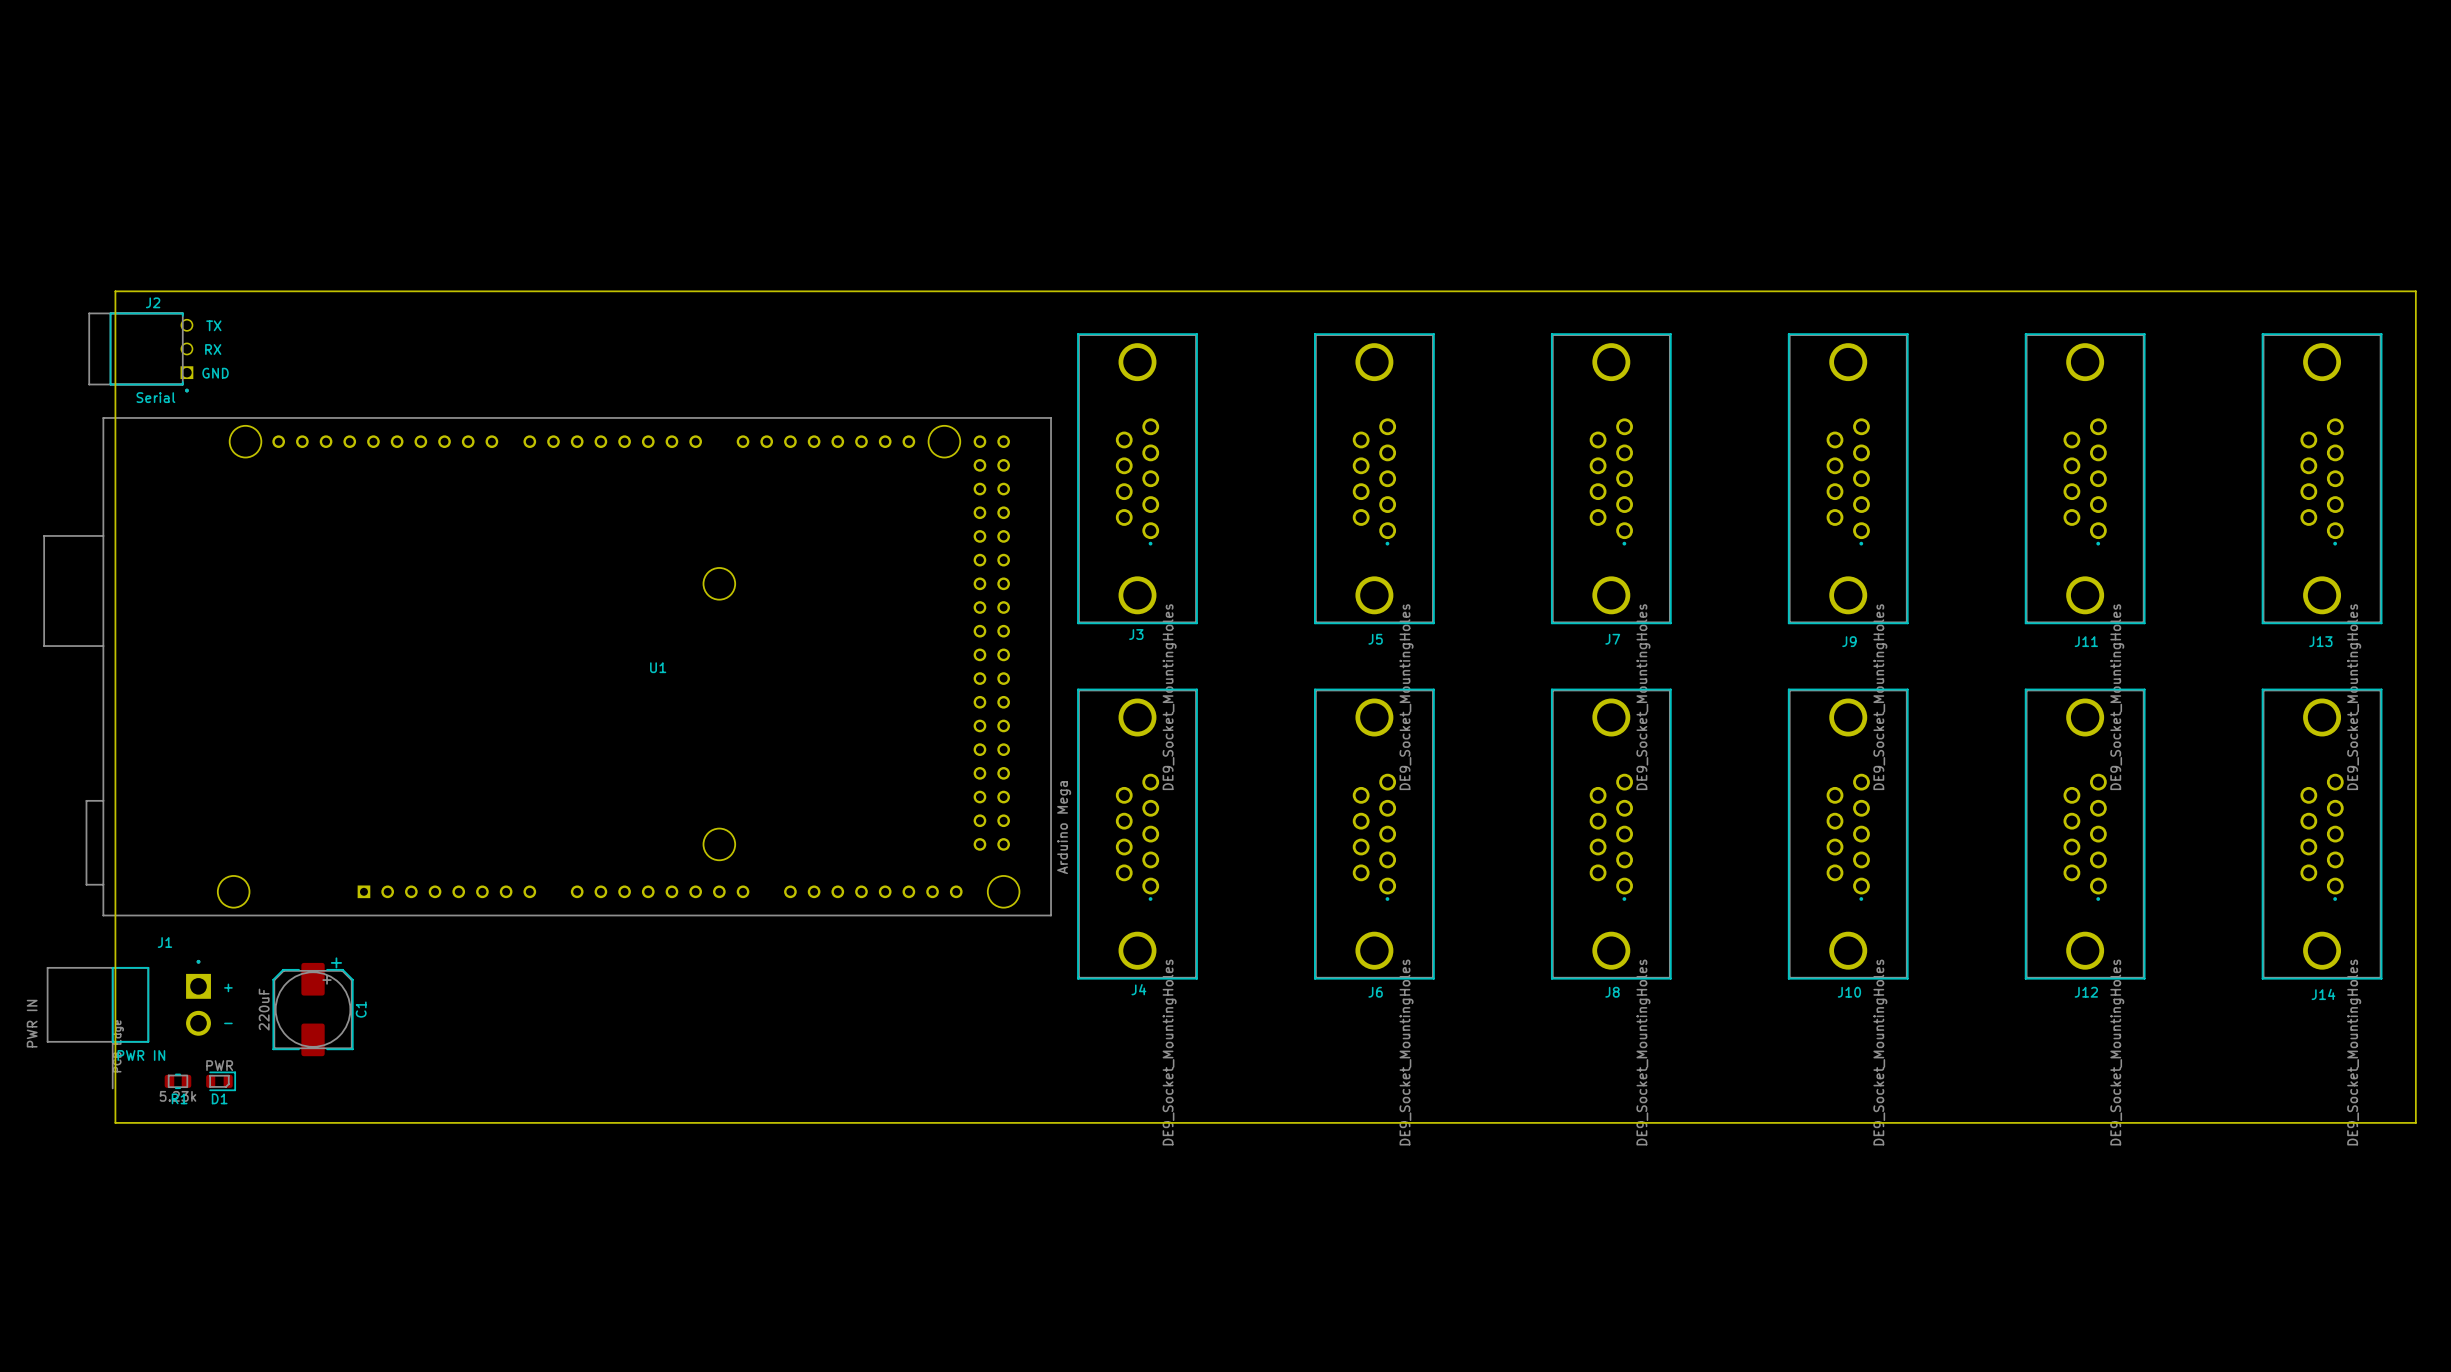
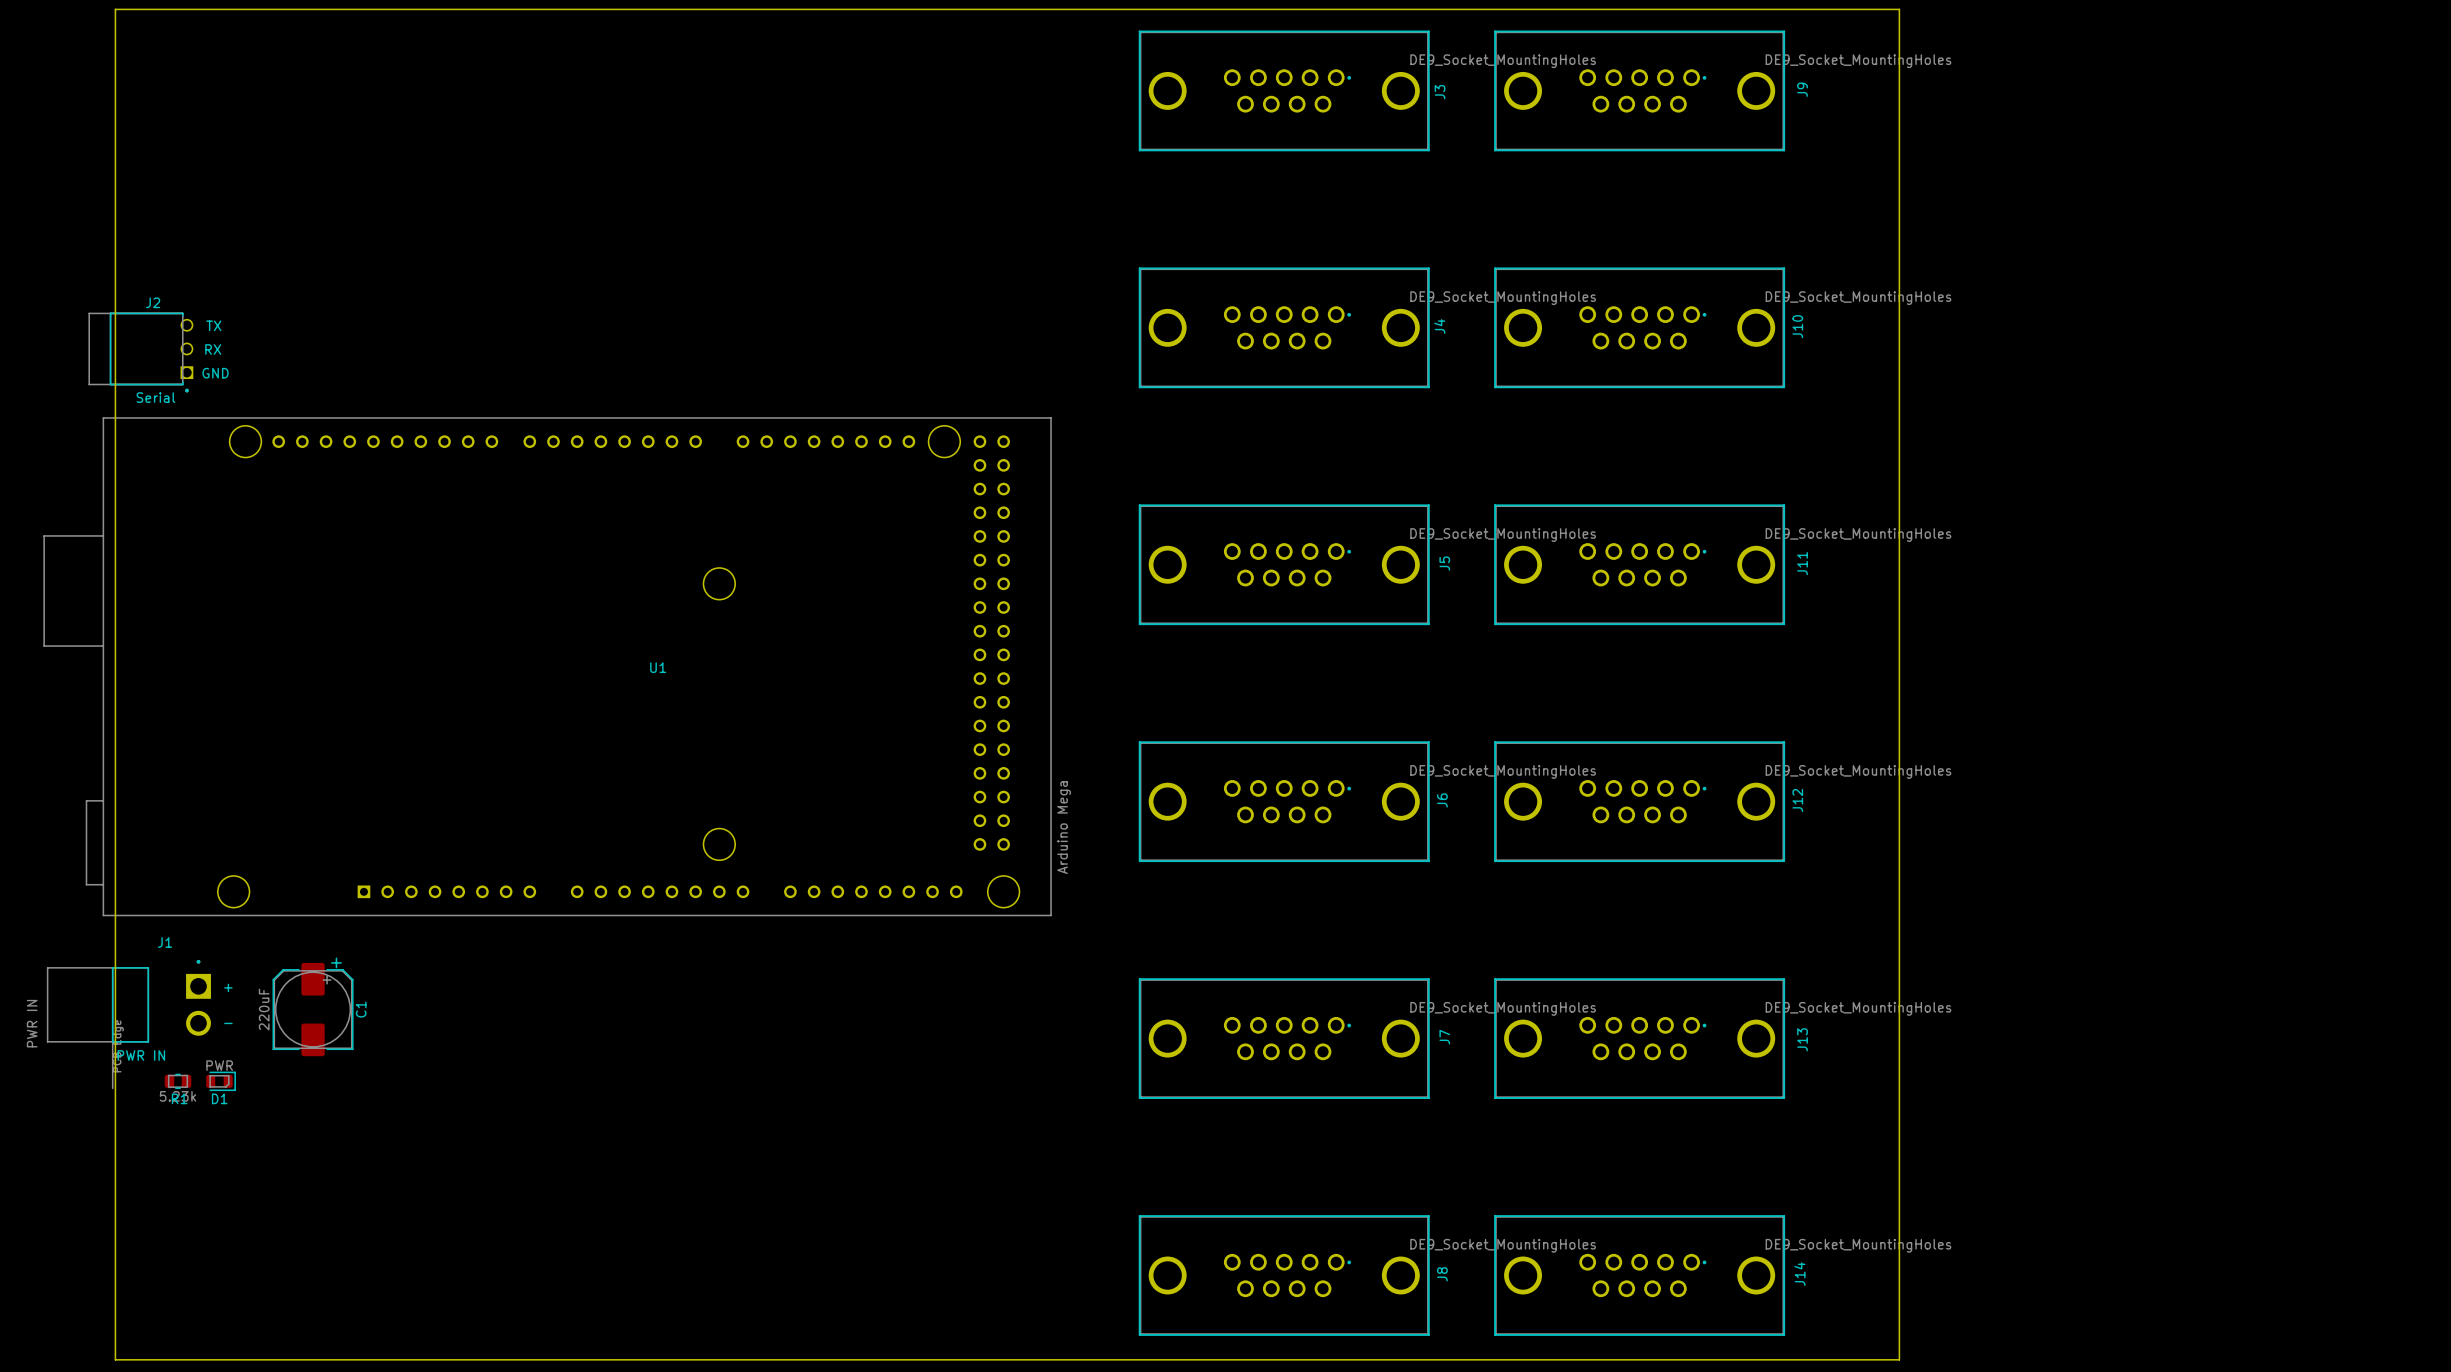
board edge: (115, 291) (2415, 291) (2415, 1122) (115, 1122) -> (115, 291) (115, 9) (1899, 9) (1899, 1359) (115, 1359) (115, 1122)
J3 rotation: 0° (1137, 478) -> 90° counterclockwise (1284, 90)
J3 position: (1137, 478) -> (1284, 90)
J5 rotation: 0° (1374, 478) -> 90° counterclockwise (1284, 564)
J7 rotation: 0° (1611, 478) -> 90° counterclockwise (1284, 1038)
J7 position: (1611, 478) -> (1284, 1038)
J9 rotation: 0° (1848, 478) -> 90° counterclockwise (1639, 90)
J9 position: (1848, 478) -> (1639, 90)
J11 rotation: 0° (2085, 478) -> 90° counterclockwise (1639, 564)
J11 position: (2085, 478) -> (1639, 564)
J13 rotation: 0° (2322, 478) -> 90° counterclockwise (1639, 1038)
J13 position: (2322, 478) -> (1639, 1038)
J4 rotation: 0° (1137, 834) -> 90° counterclockwise (1284, 327)
J4 position: (1137, 834) -> (1284, 327)
J6 rotation: 0° (1374, 834) -> 90° counterclockwise (1284, 801)
J8 rotation: 0° (1611, 834) -> 90° counterclockwise (1284, 1275)
J8 position: (1611, 834) -> (1284, 1275)
J10 rotation: 0° (1848, 834) -> 90° counterclockwise (1639, 327)
J10 position: (1848, 834) -> (1639, 327)
J12 rotation: 0° (2085, 834) -> 90° counterclockwise (1639, 801)
J12 position: (2085, 834) -> (1639, 801)
J14 rotation: 0° (2322, 834) -> 90° counterclockwise (1639, 1275)
J14 position: (2322, 834) -> (1639, 1275)

